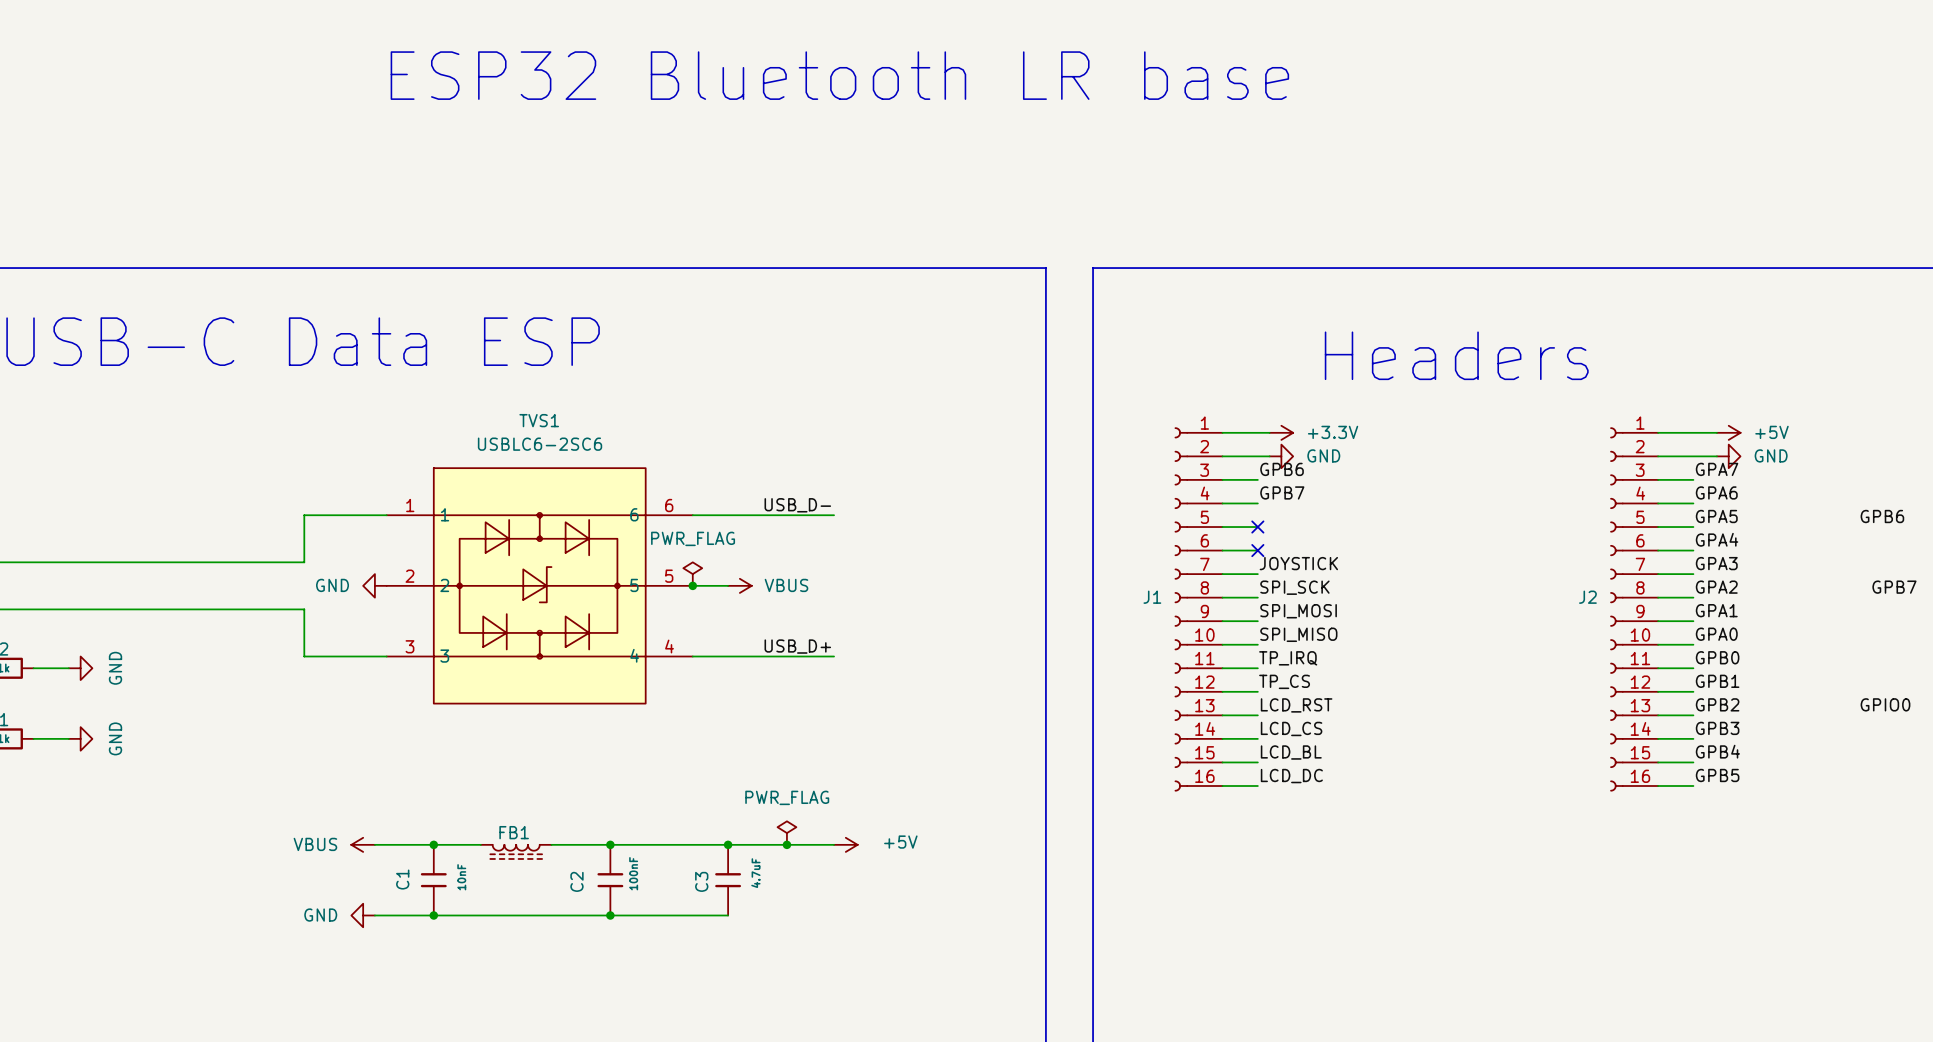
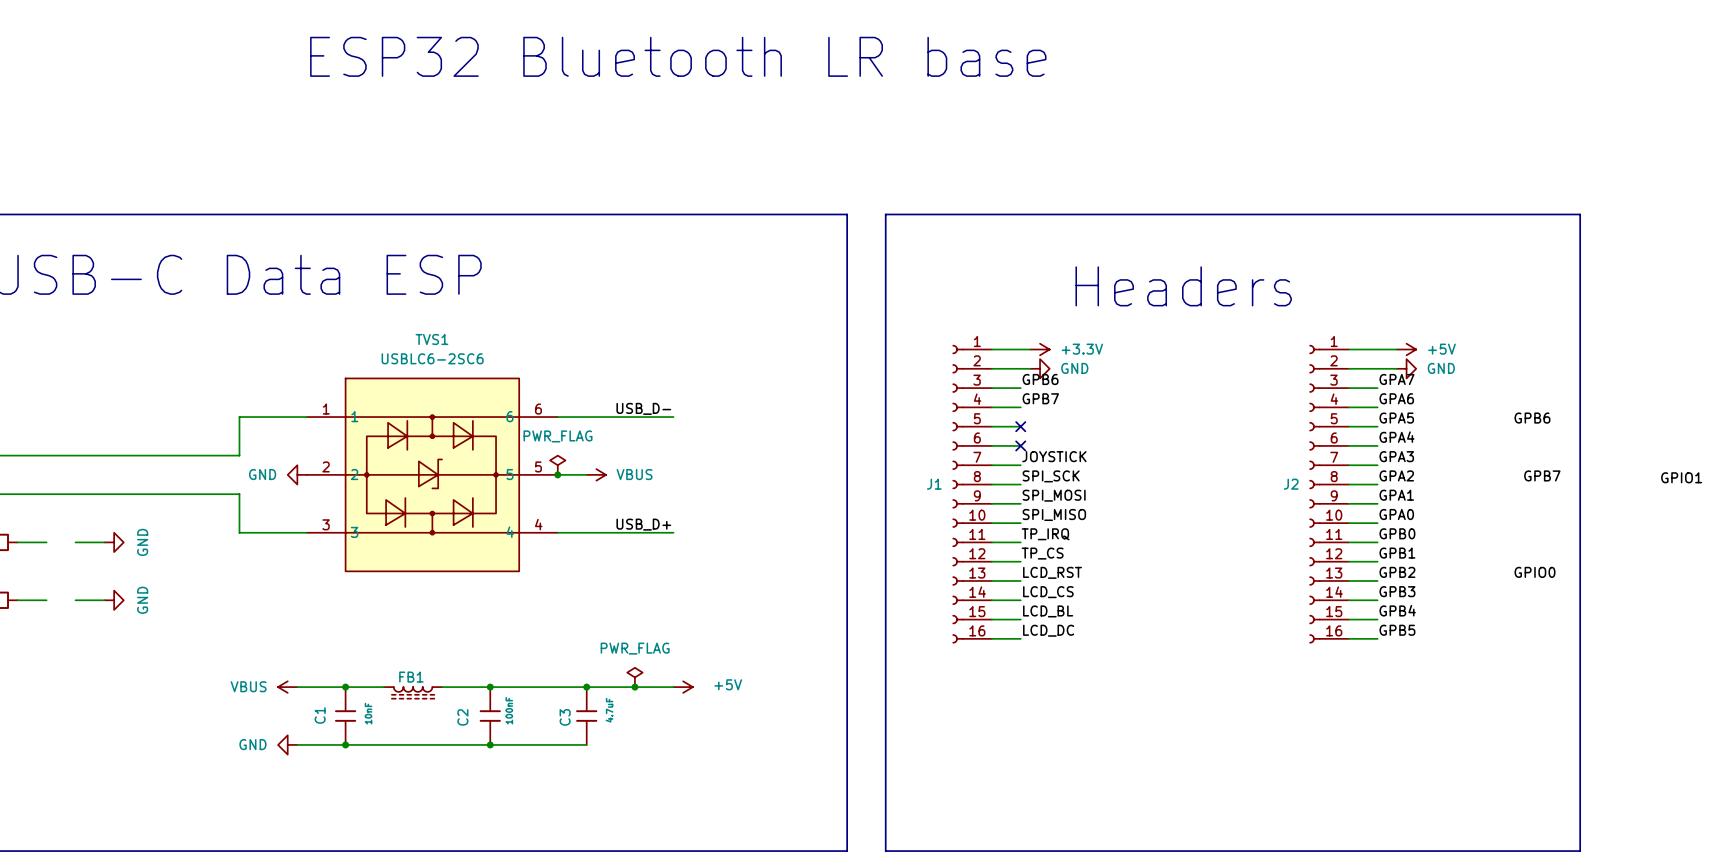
power symbol: GND (80, 668) -> none
wire: none -> (75, 542) (104, 542)
power symbol: none -> GND (114, 542)
power symbol: GND (80, 738) -> none
wire: none -> (75, 600) (104, 600)
power symbol: none -> GND (114, 600)

